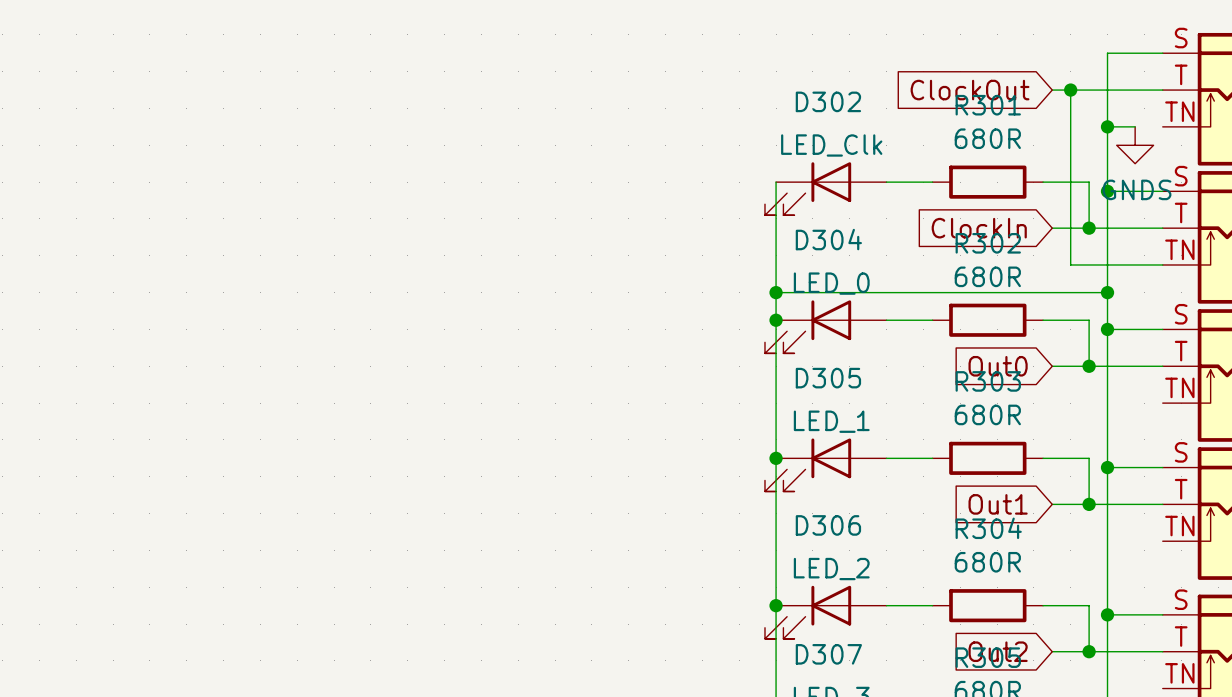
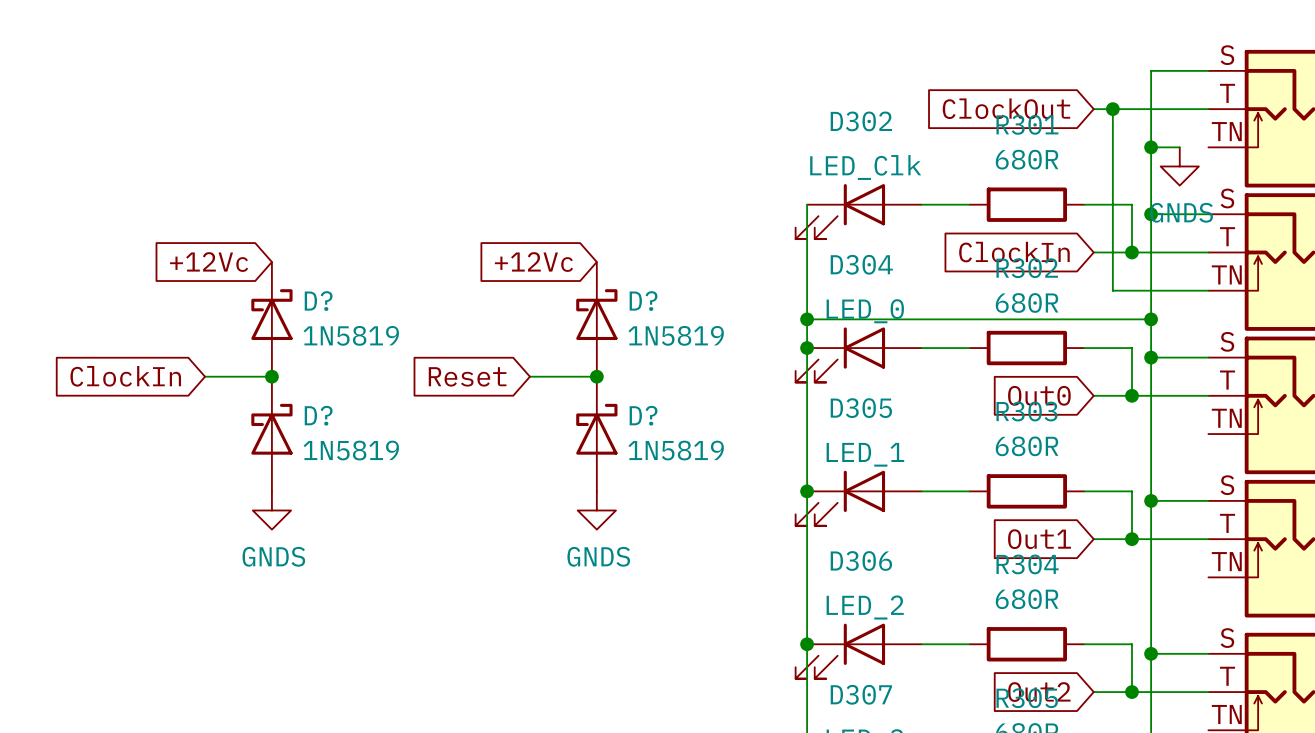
global label: none -> +12Vc (209, 262)
global label: none -> +12Vc (533, 262)
D?: none -> 1N5819 (271, 319)
D?: none -> 1N5819 (596, 319)
global label: none -> ClockIn (125, 376)
wire: none -> (205, 376) (271, 376)
junction: none -> (271, 376)
global label: none -> Reset (467, 376)
wire: none -> (529, 376) (596, 376)
junction: none -> (596, 376)
D?: none -> 1N5819 (271, 434)
D?: none -> 1N5819 (596, 434)
power symbol: none -> GNDS (271, 510)
power symbol: none -> GNDS (596, 510)

